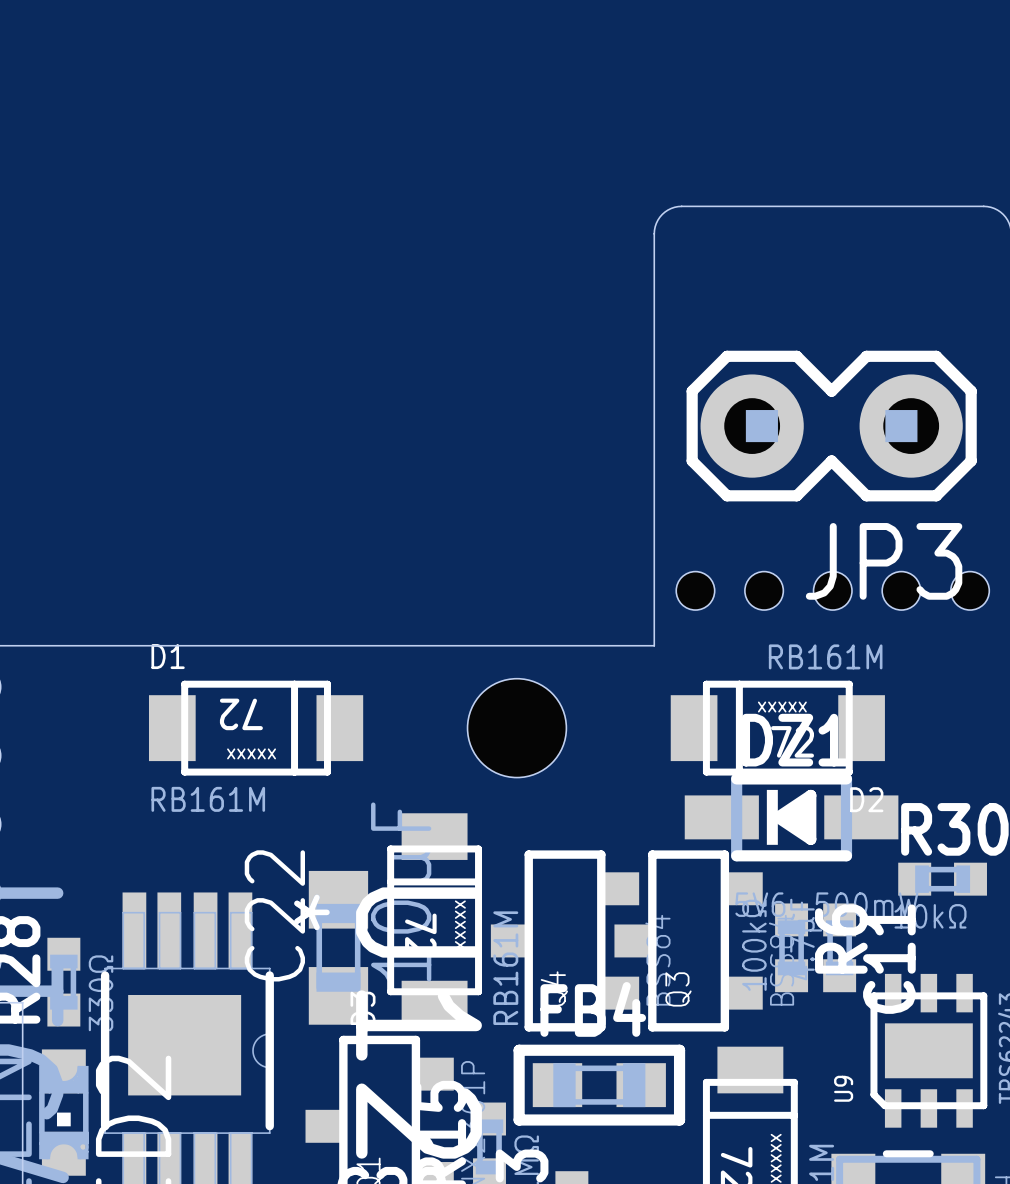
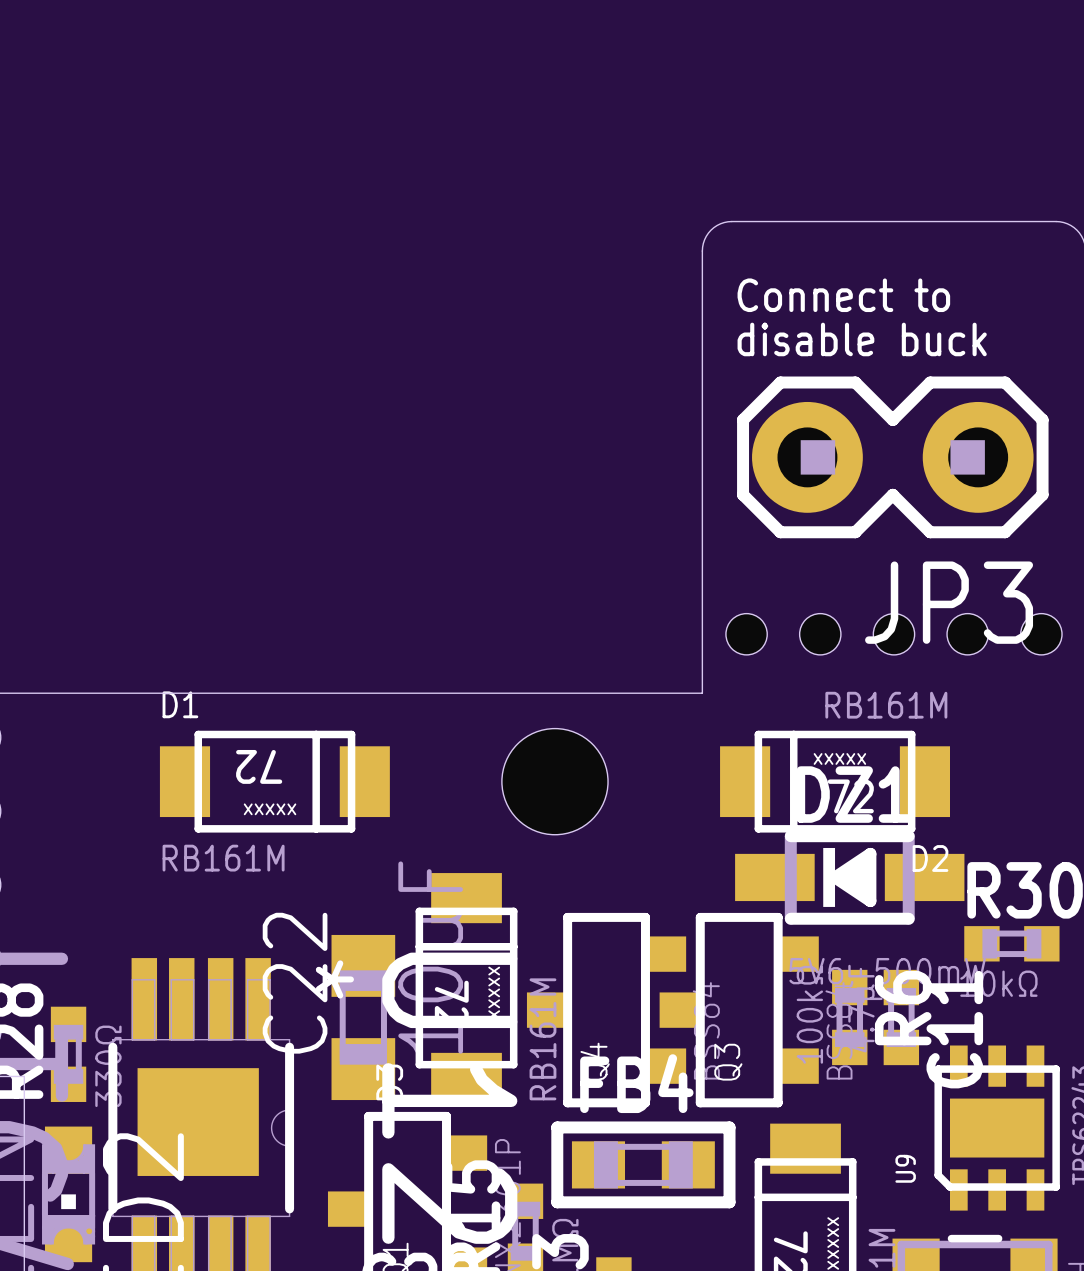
text: none -> Connect to (843, 295)
text: none -> disable buck (862, 339)

